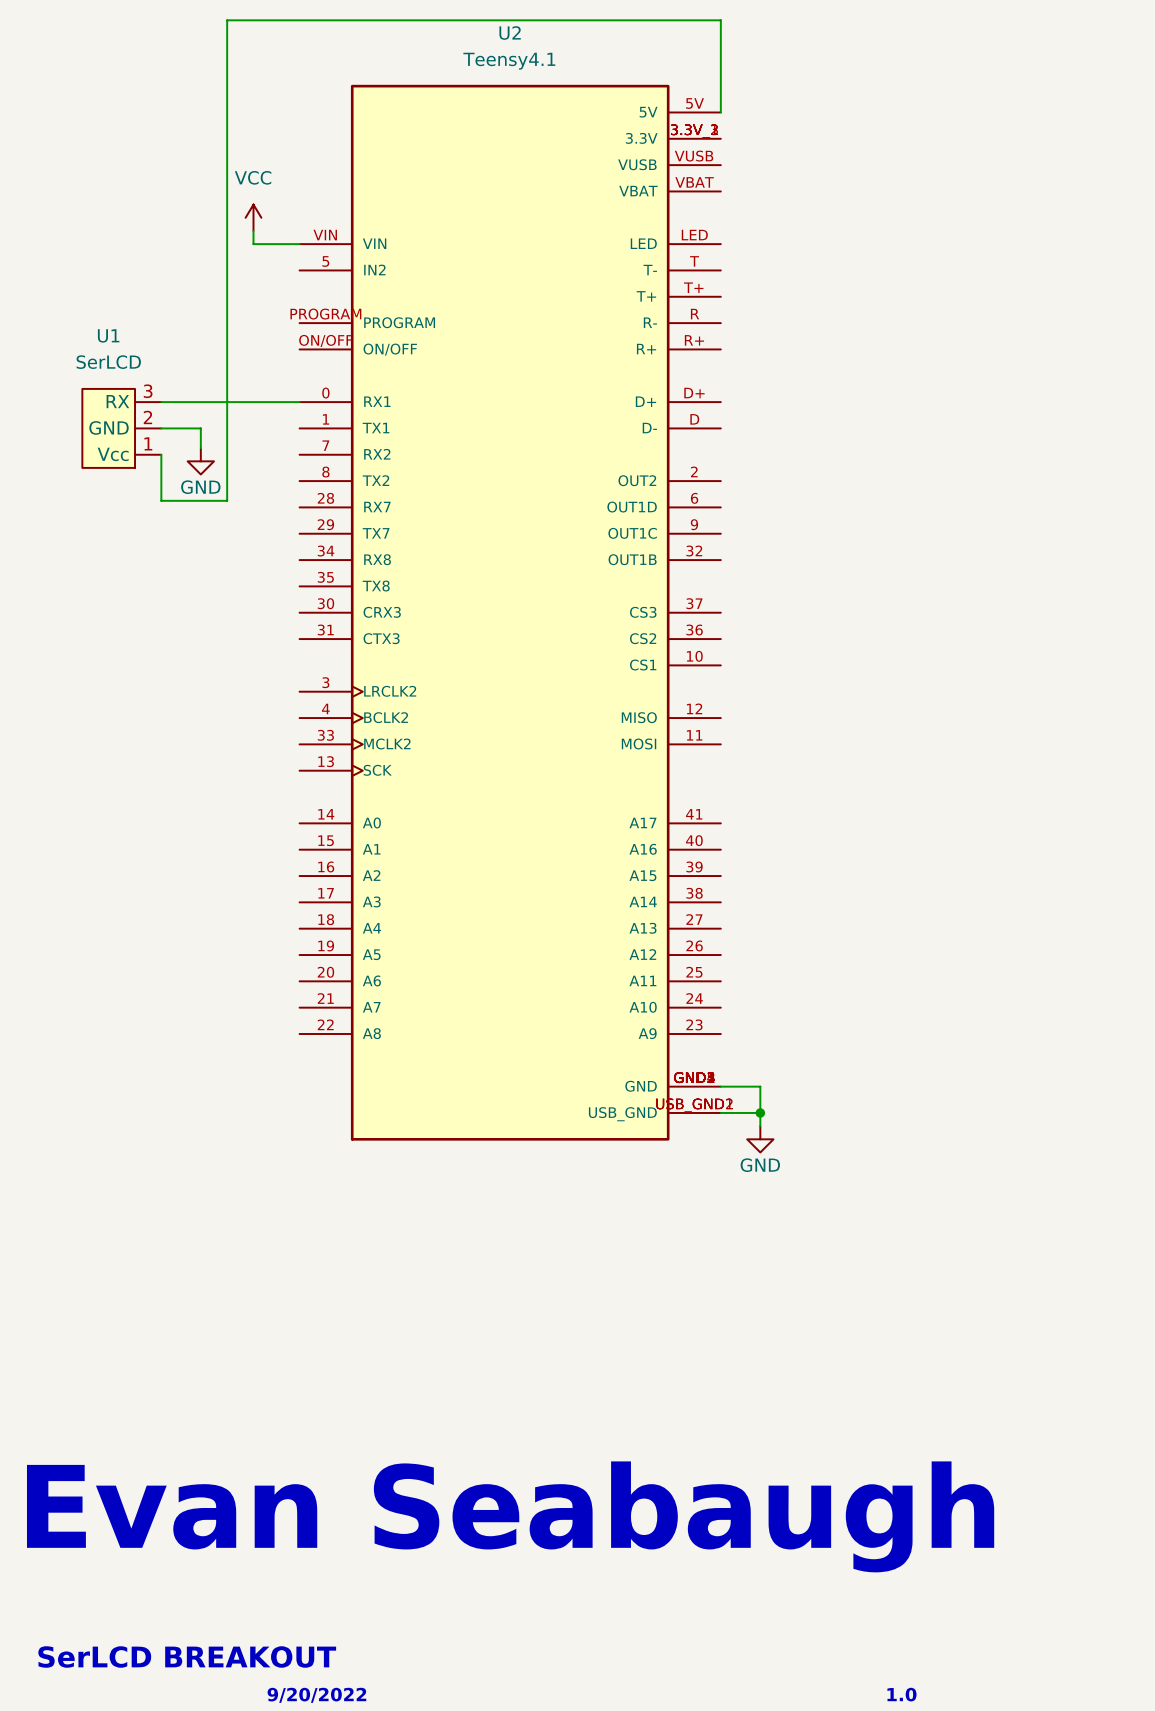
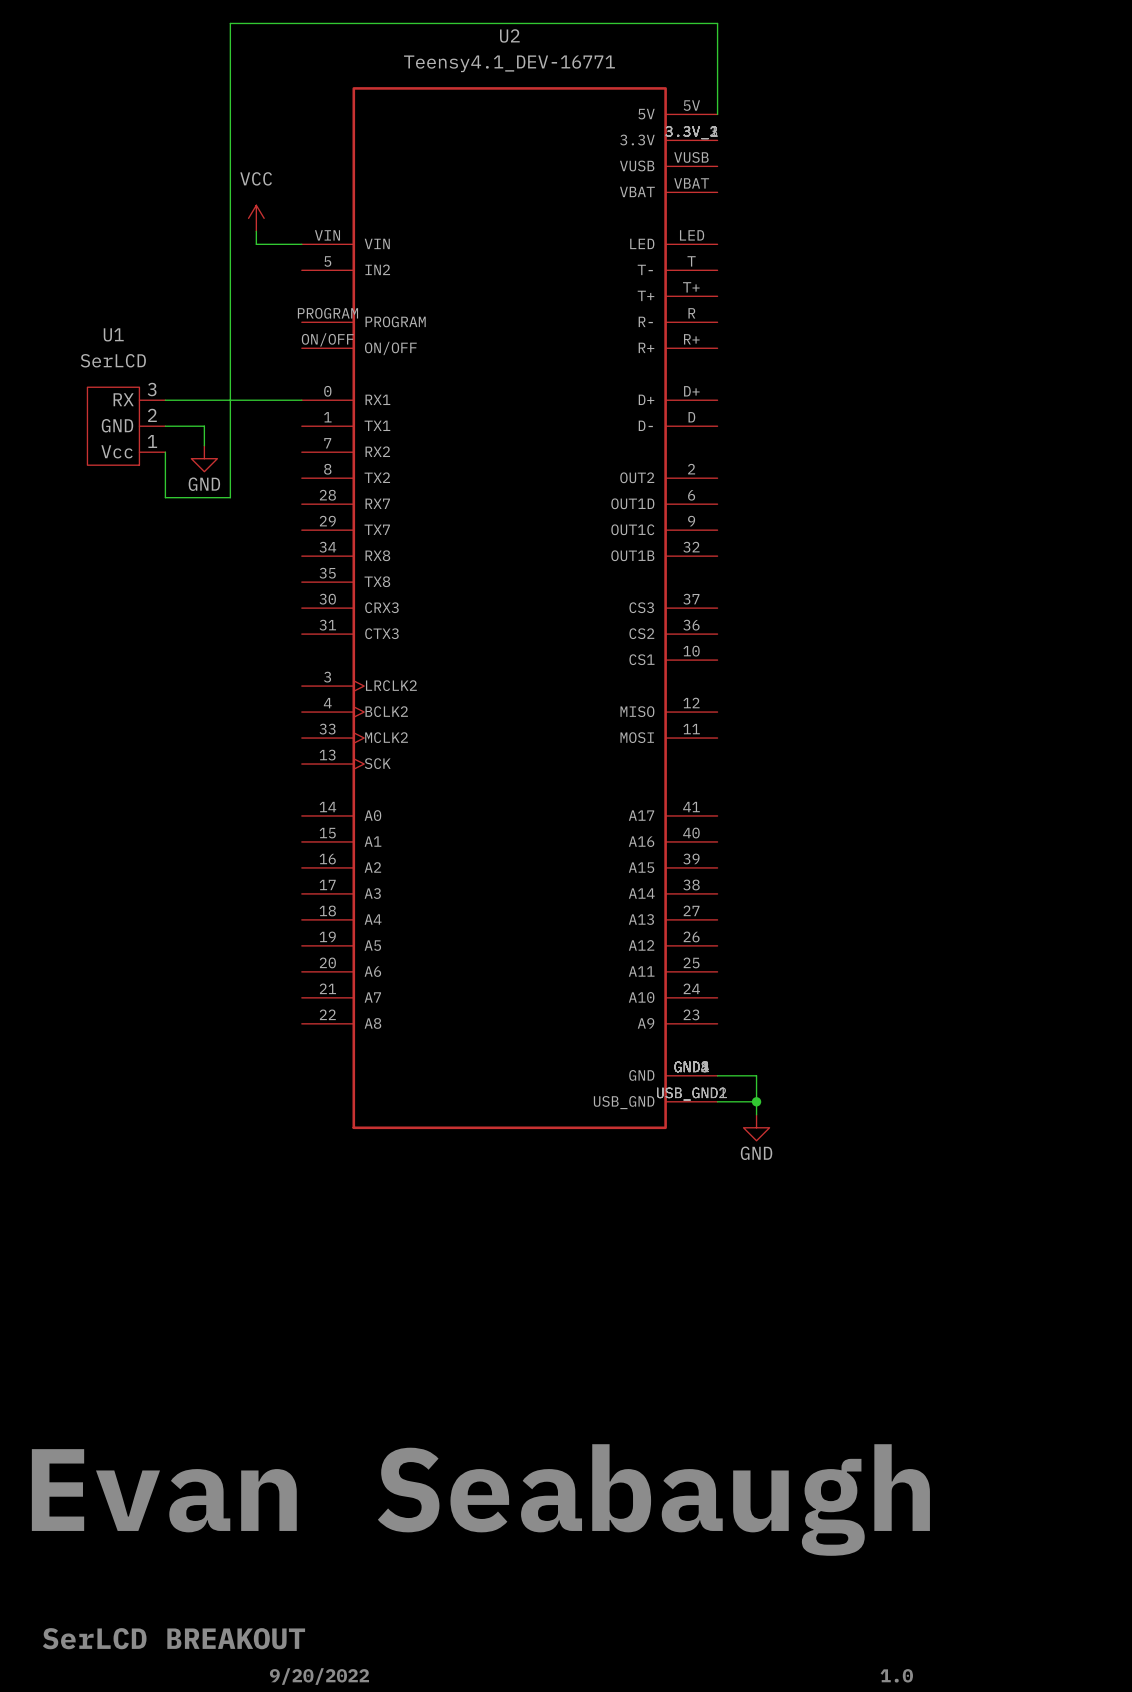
U2 value: Teensy4.1 (509, 61) -> Teensy4.1_DEV-16771 (509, 63)

